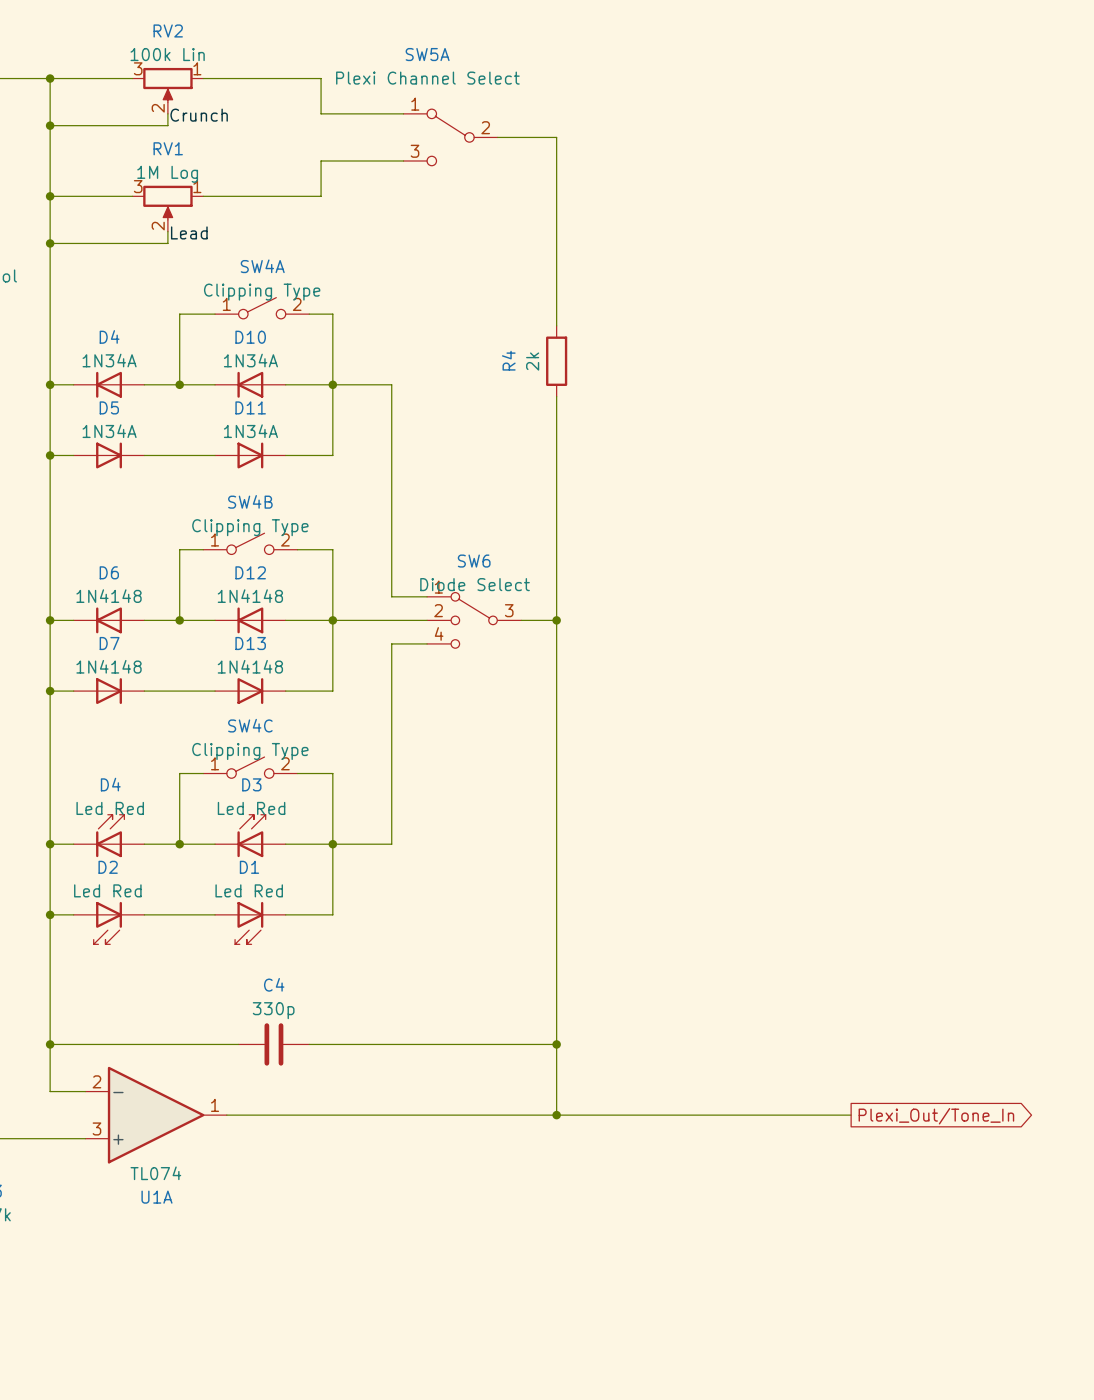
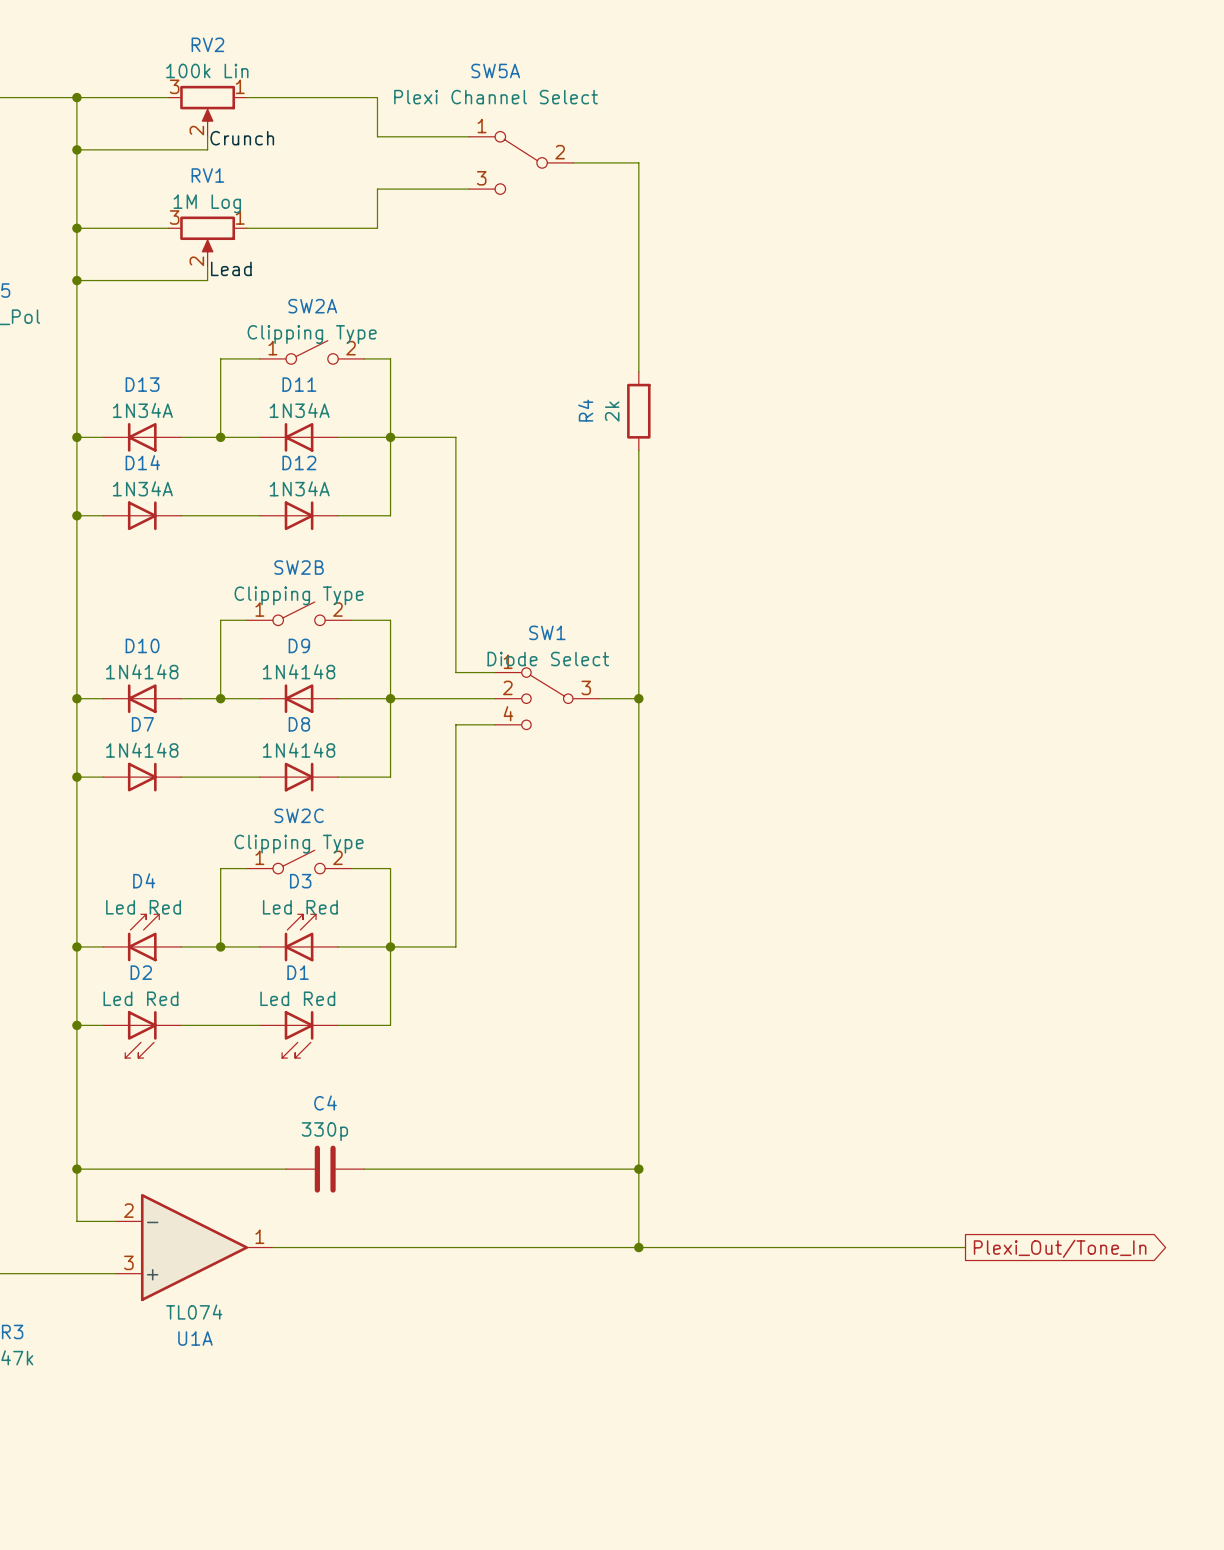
SW4A name: SW4A (262, 266) -> SW2A (312, 306)
D4 name: D4 (109, 336) -> D13 (142, 384)
D10 name: D10 (250, 337) -> D11 (299, 384)
D5 name: D5 (109, 407) -> D14 (142, 462)
D11 name: D11 (250, 407) -> D12 (299, 463)
SW4B name: SW4B (250, 501) -> SW2B (299, 567)
SW6 name: SW6 (474, 561) -> SW1 (547, 632)
D6 name: D6 (109, 572) -> D10 (142, 645)
D12 name: D12 (250, 572) -> D9 (299, 645)
D13 name: D13 (250, 643) -> D8 (299, 724)
SW4C name: SW4C (250, 725) -> SW2C (299, 815)

